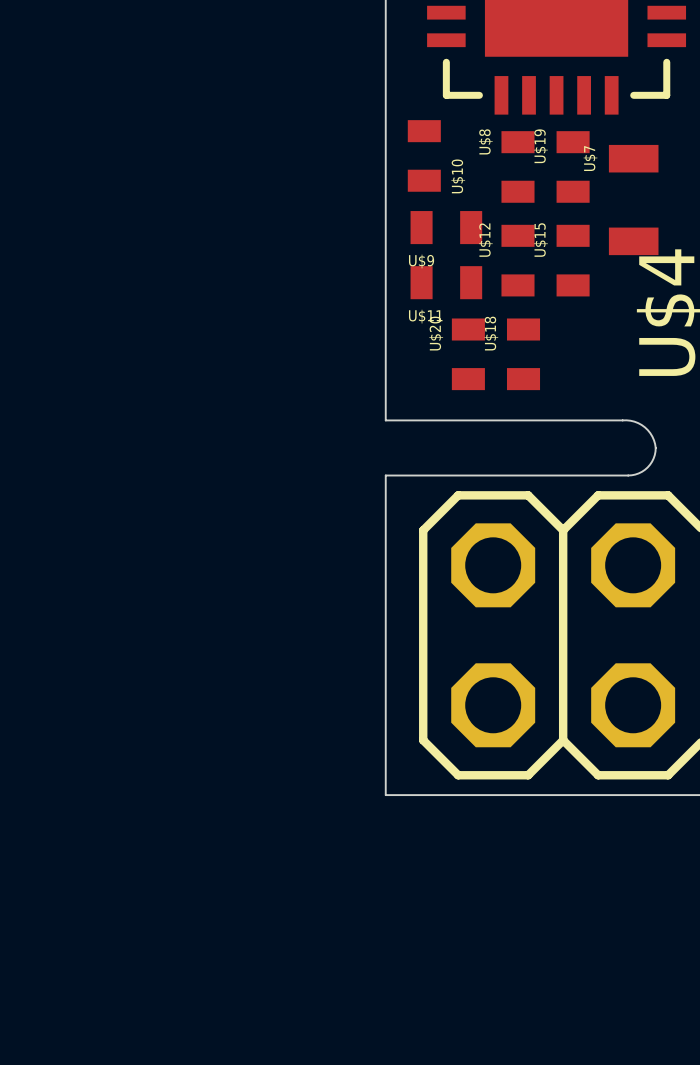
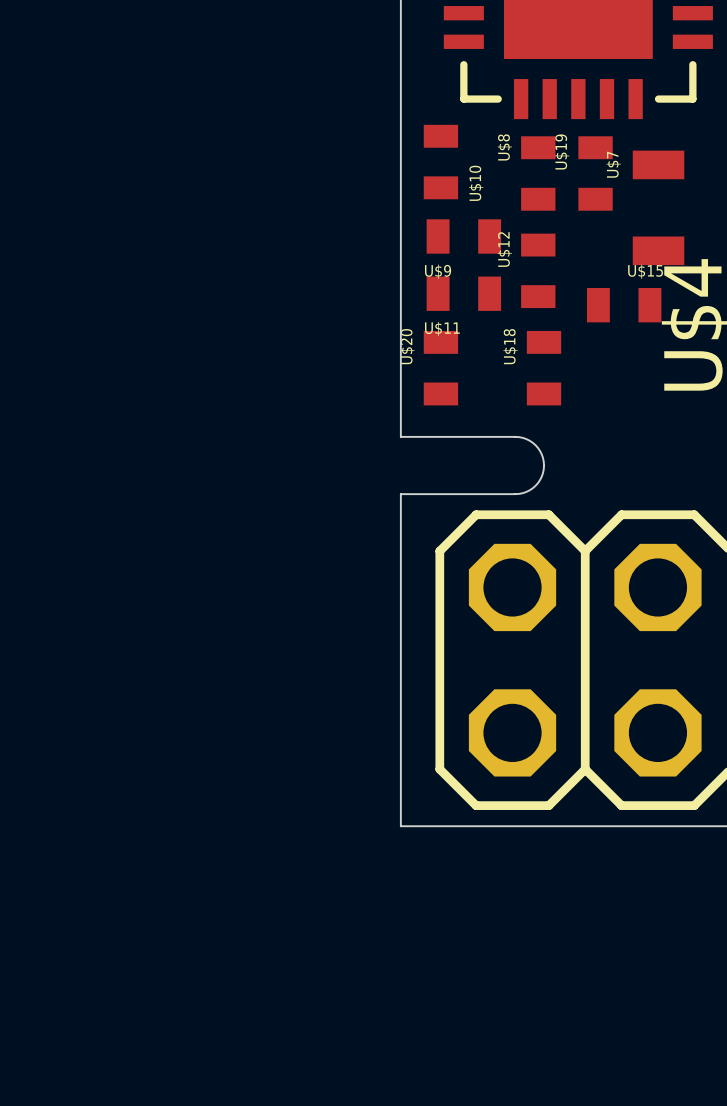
U$15 rotation: 0° (573, 260) -> 90° clockwise (624, 305)
U$15 position: (573, 260) -> (624, 305)
U$20 position: (468, 354) -> (440, 368)
board edge: (495, 420) (630, 420) (641, 425) (647, 430) (652, 436) (655, 447) (653, 458) (647, 467) (631, 475) (495, 475) -> (515, 436) (526, 439) (535, 445) (541, 454) (544, 465) (541, 476) (535, 485) (526, 491) (515, 494)

